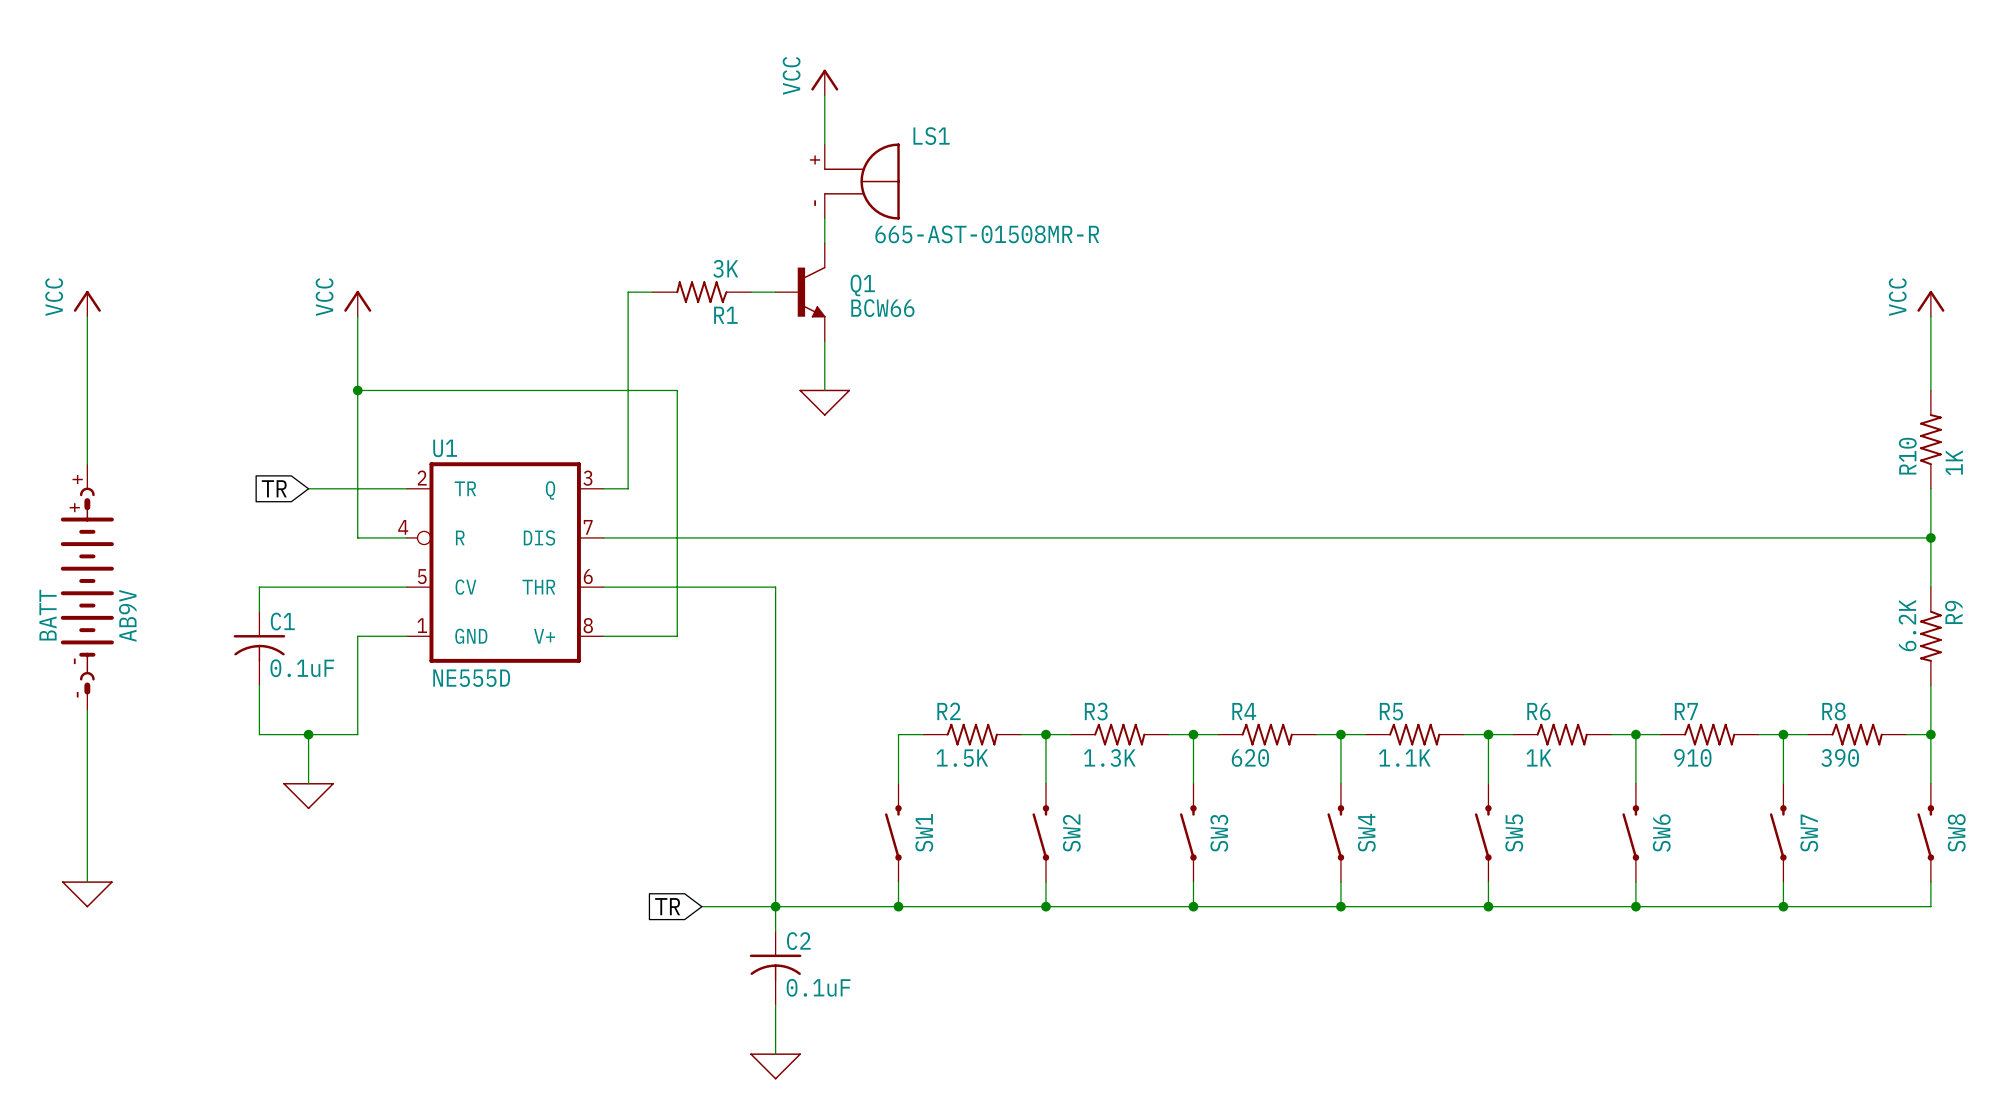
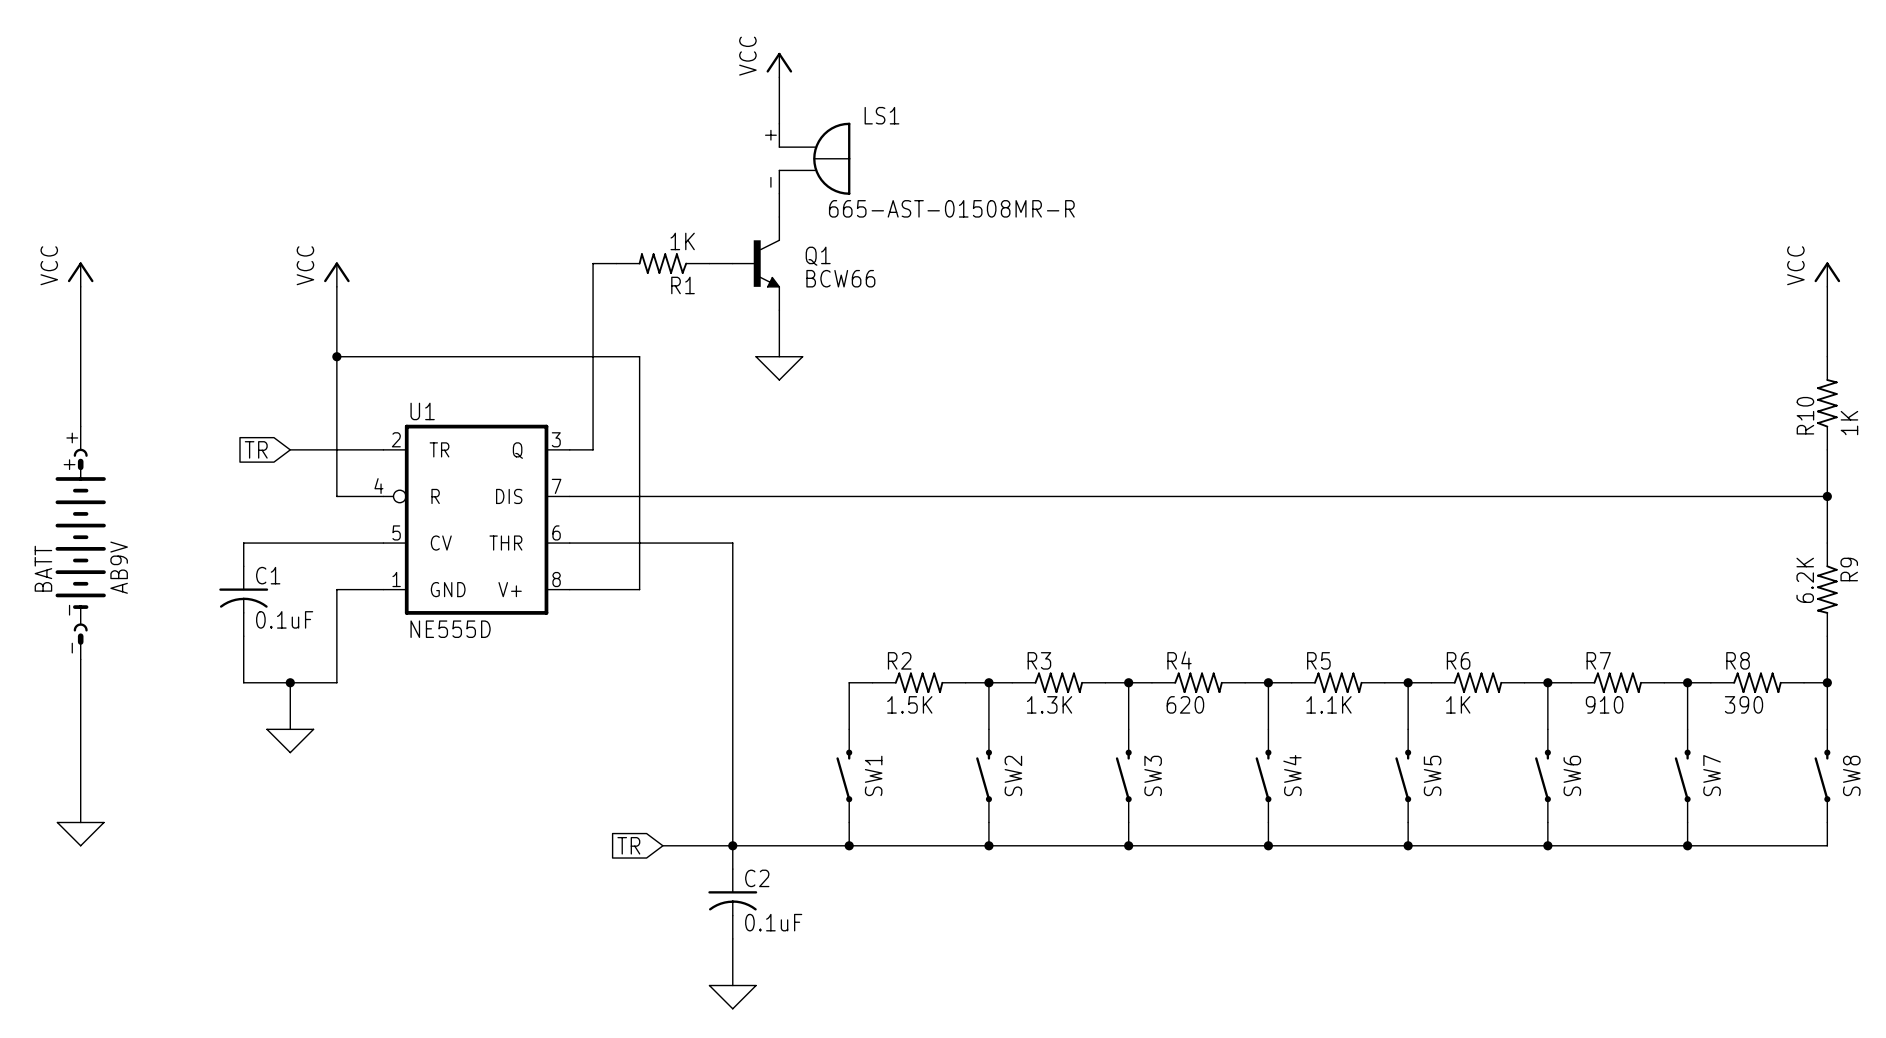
R1 value: 3K (725, 268) -> 1K (682, 241)

